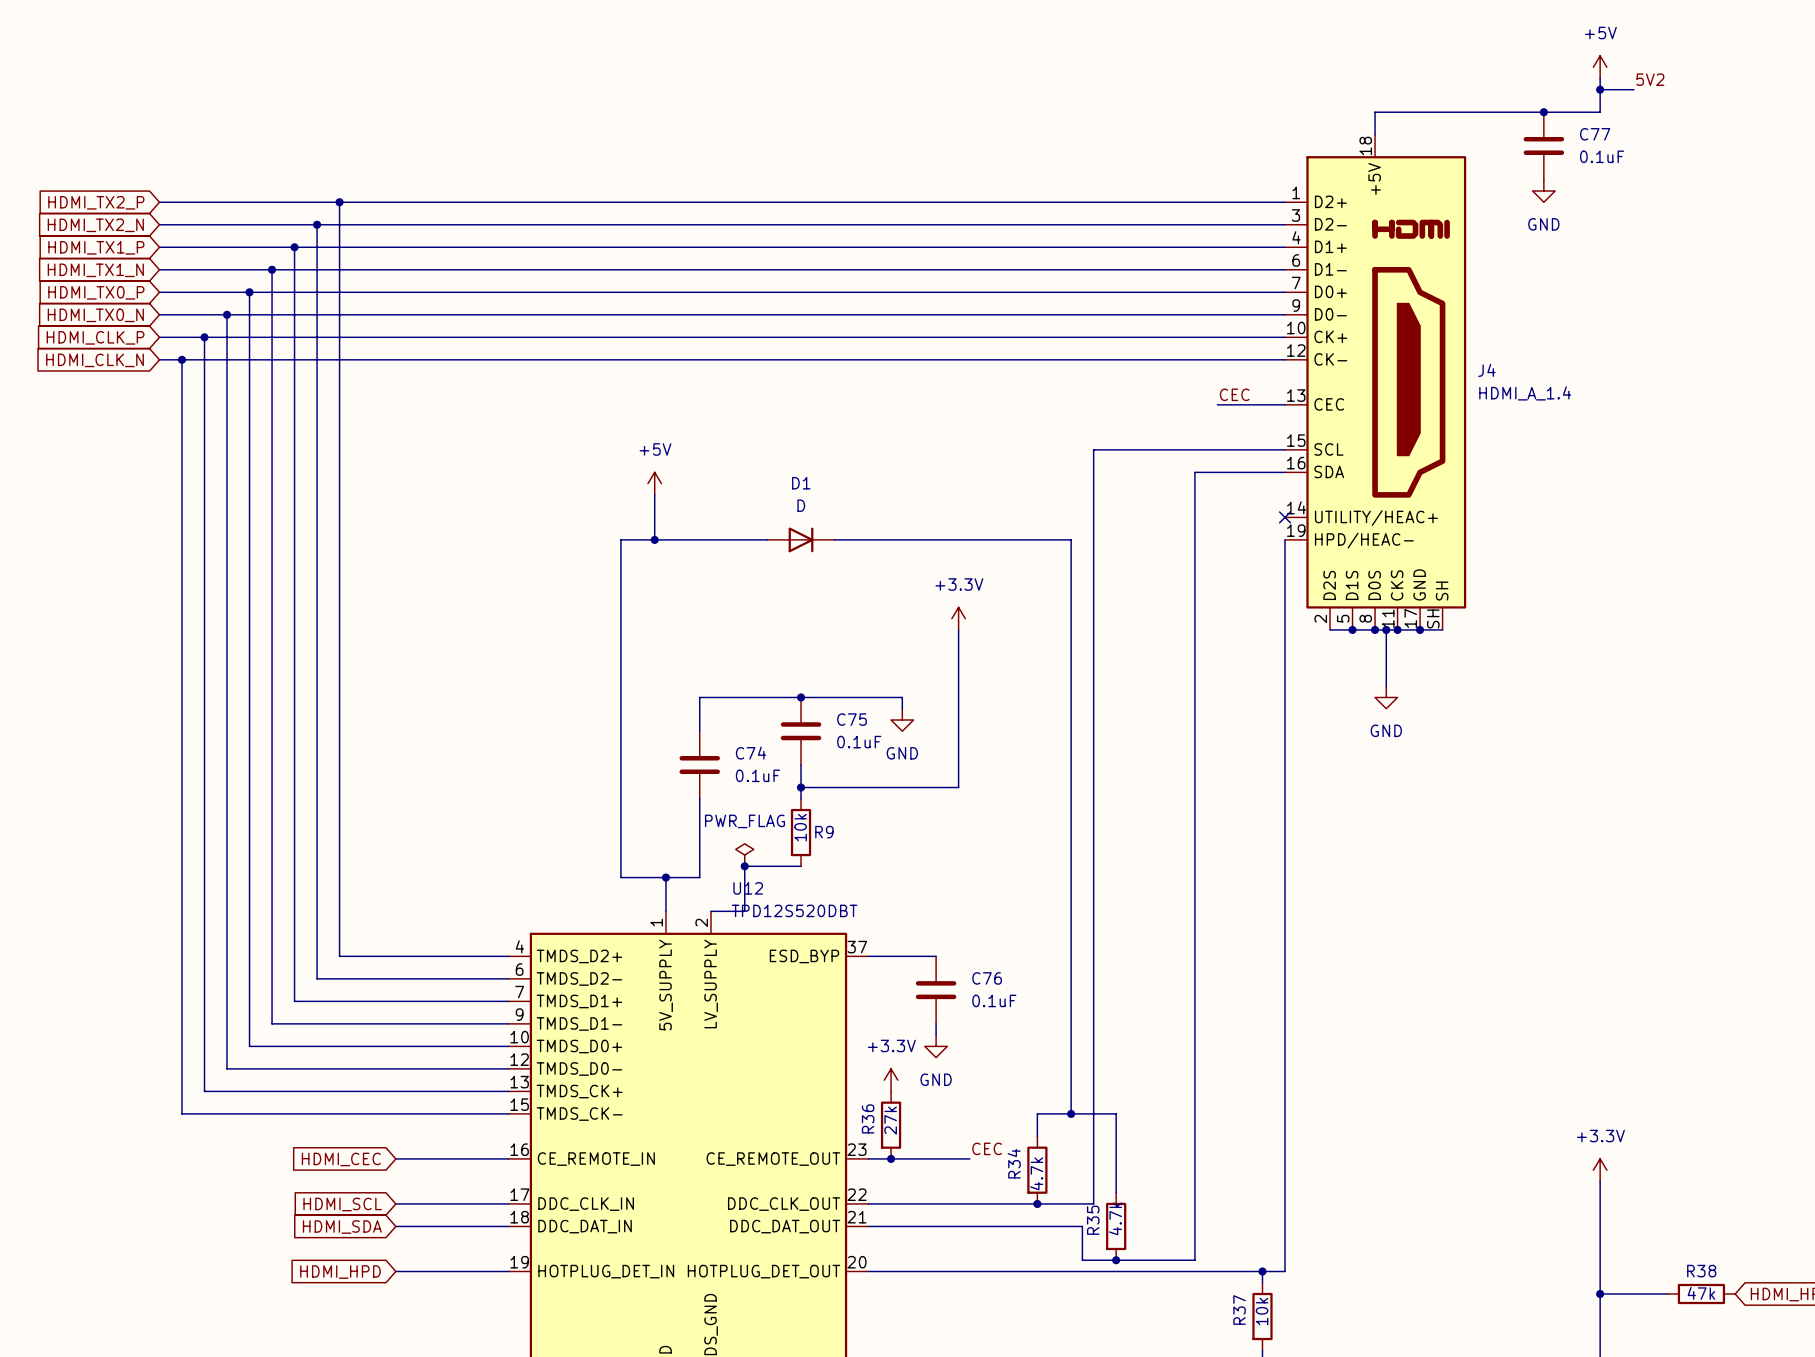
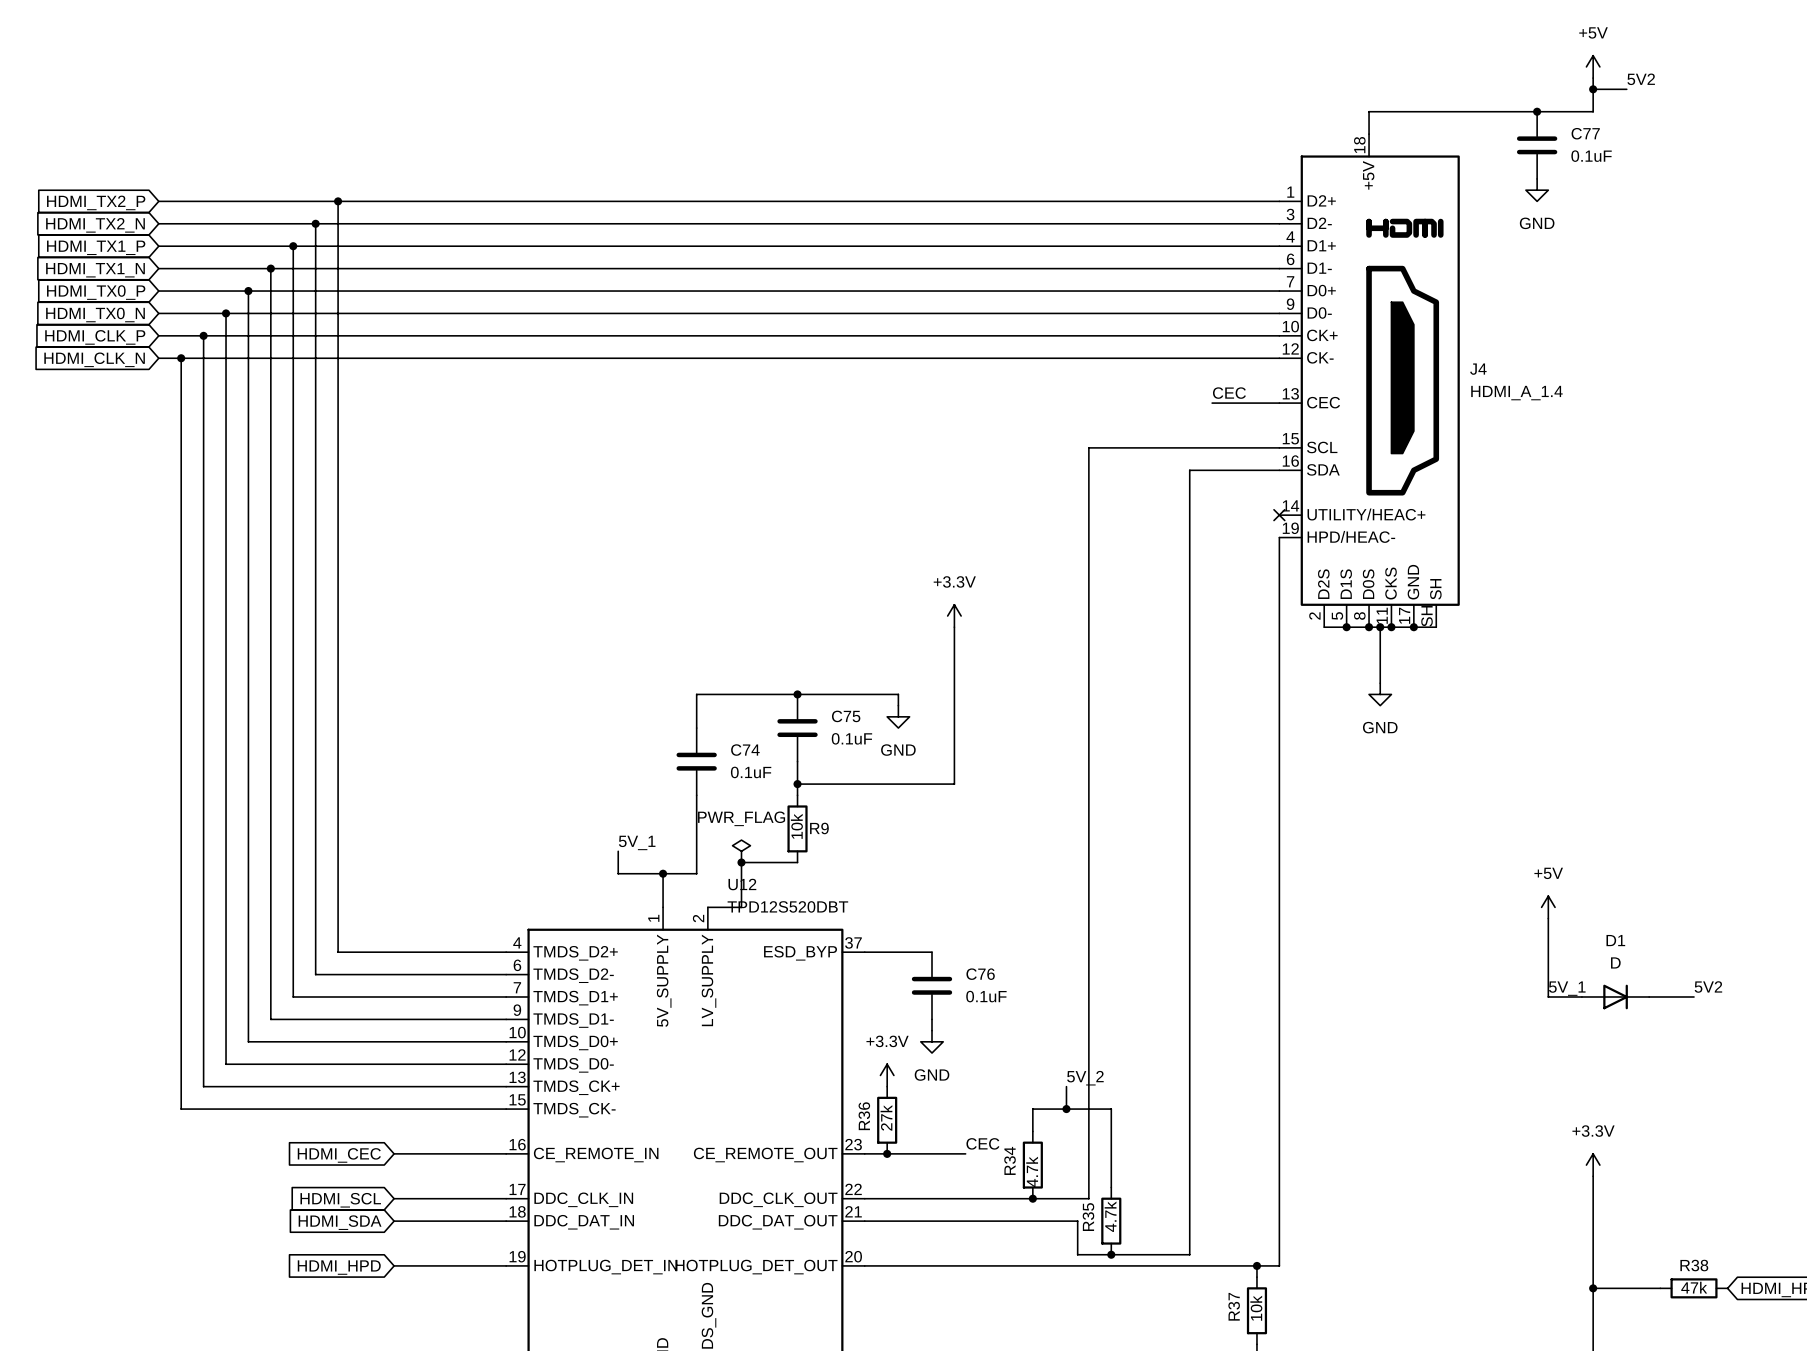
power symbol: +5V (654, 483) -> none
wire: (654, 494) (654, 539) -> none
junction: (654, 539) -> none
wire: (767, 539) (620, 539) (620, 855) -> none
D1 position: (801, 539) -> (1615, 997)
wire: (834, 539) (1071, 539) (1071, 1091) -> none
label: none -> 5V_1 (637, 842)
power symbol: none -> +5V (1548, 907)
wire: none -> (1548, 918) (1548, 997) (1581, 997)
label: none -> 5V_1 (1567, 988)
label: none -> 5V2 (1708, 986)
wire: none -> (1649, 997) (1694, 997)
label: none -> 5V_2 (1085, 1078)

